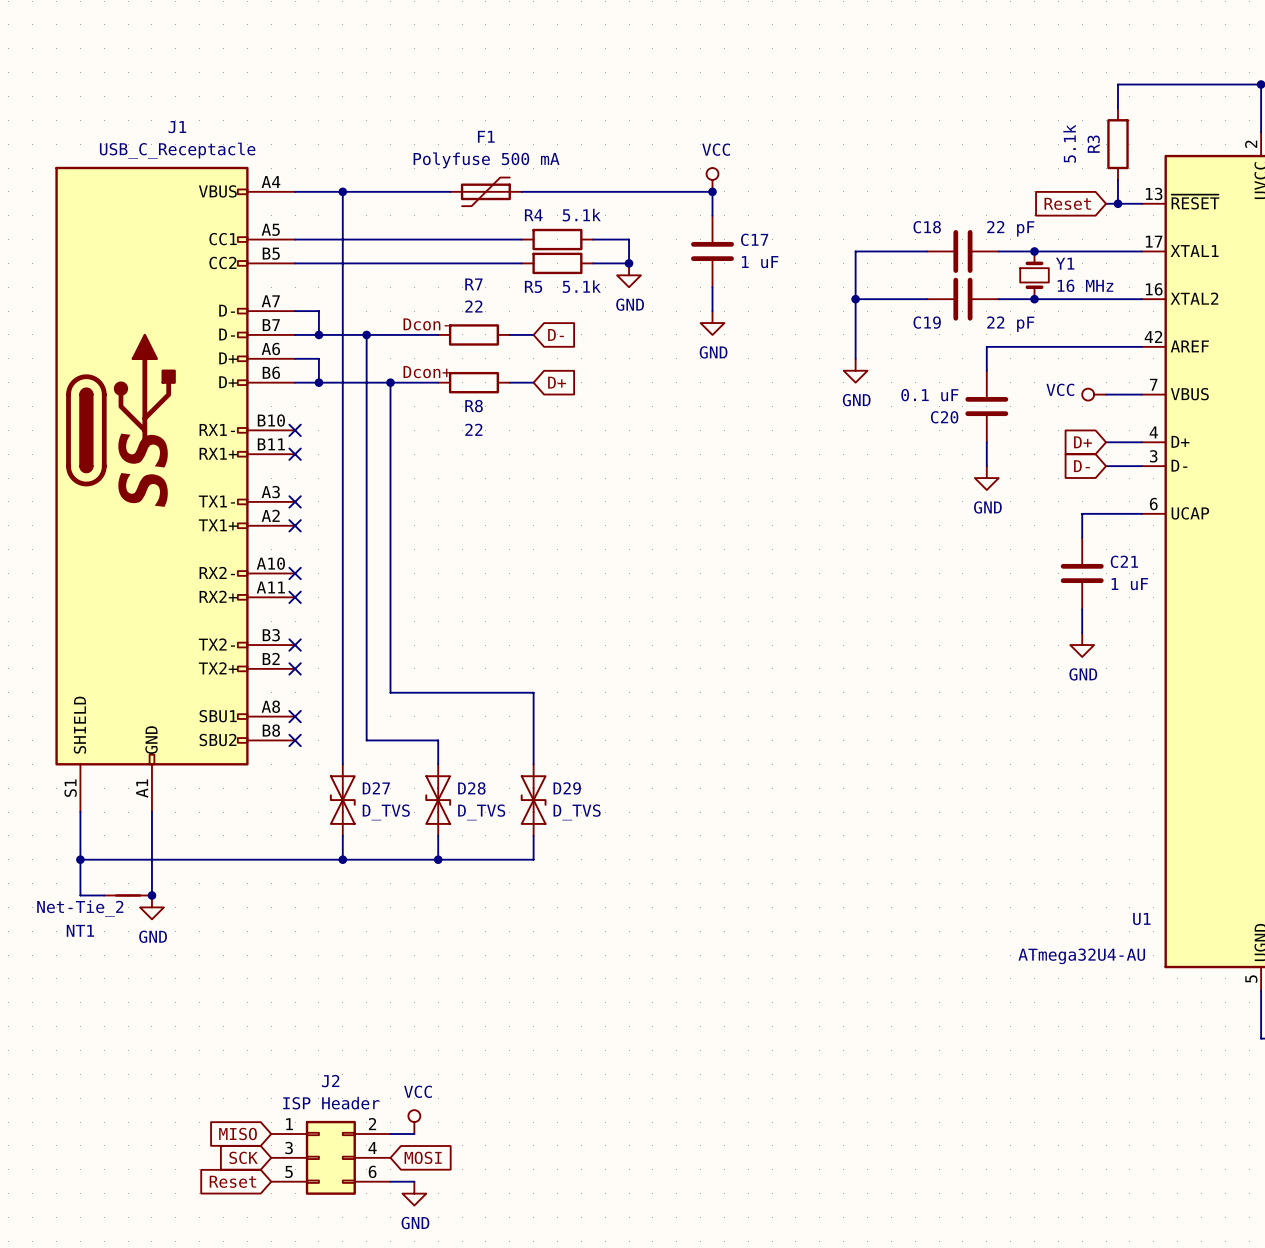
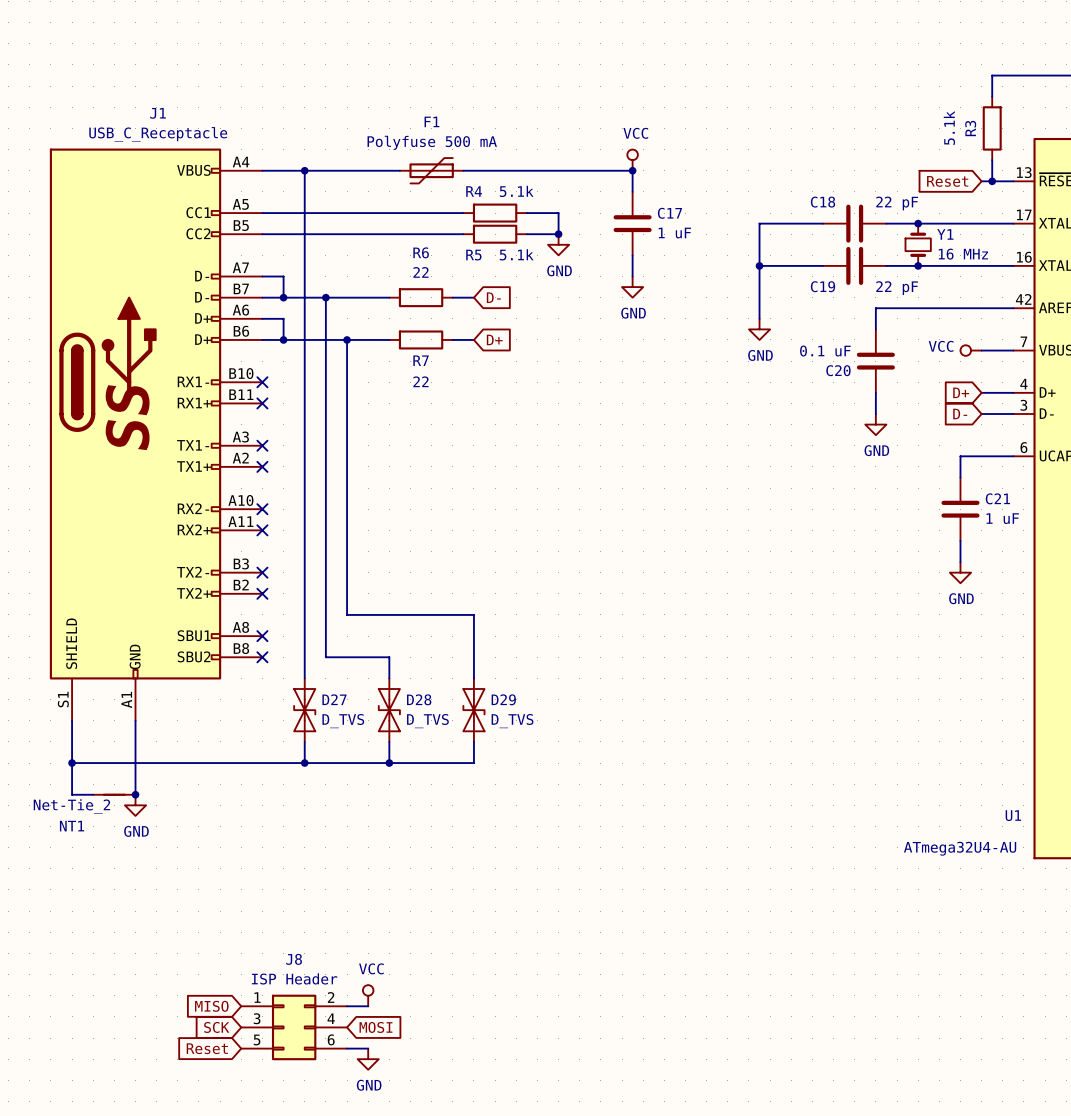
R7 name: R7 (473, 284) -> R6 (421, 252)
label: Dcon- (426, 324) -> none
label: Dcon+ (427, 372) -> none
R8 name: R8 (474, 406) -> R7 (421, 360)
J2 name: J2 (330, 1081) -> J8 (294, 959)

